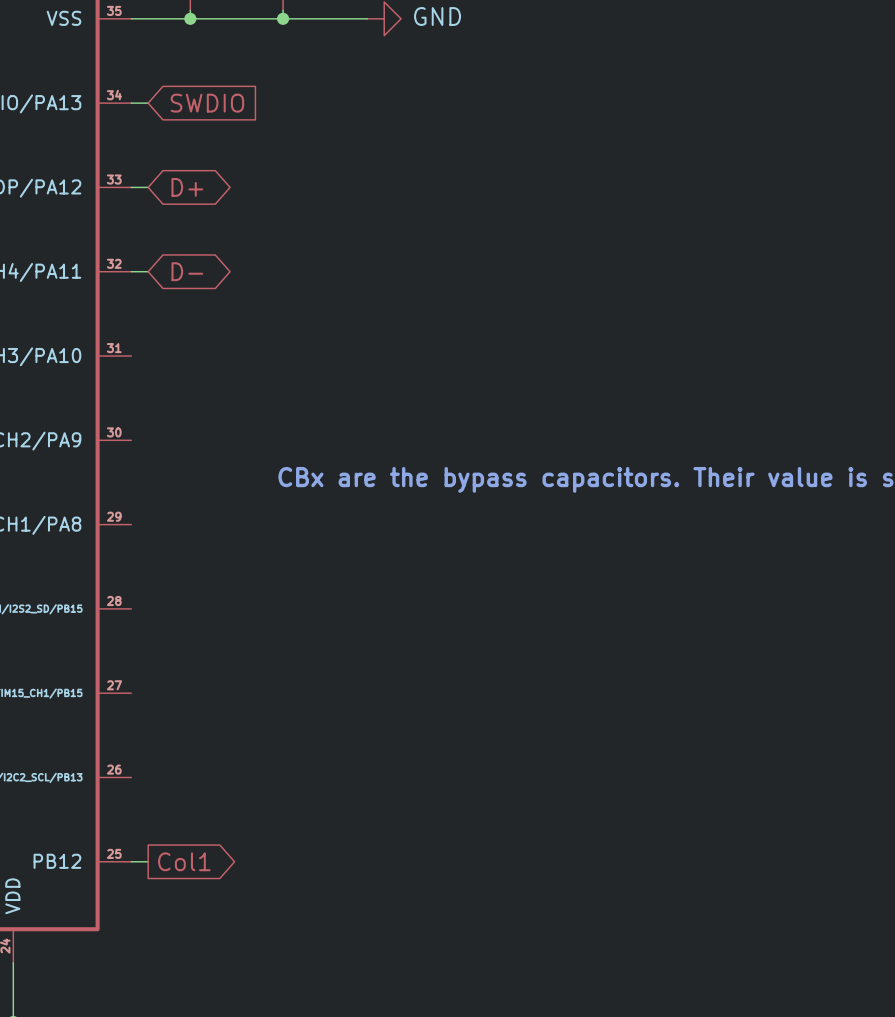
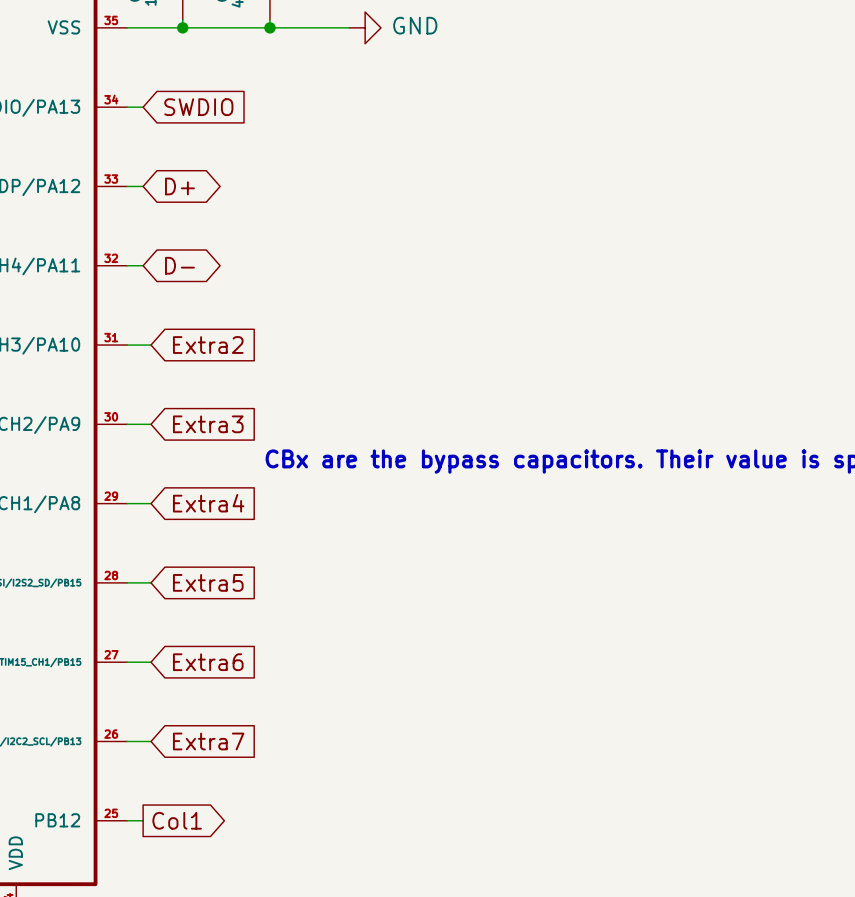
wire: none -> (127, 345) (151, 345)
global label: none -> Extra2 (208, 345)
wire: none -> (127, 424) (151, 424)
global label: none -> Extra3 (208, 424)
wire: none -> (127, 503) (151, 503)
global label: none -> Extra4 (208, 503)
wire: none -> (127, 582) (151, 582)
global label: none -> Extra5 (208, 582)
wire: none -> (127, 662) (151, 662)
global label: none -> Extra6 (208, 662)
wire: none -> (127, 741) (151, 741)
global label: none -> Extra7 (208, 741)

